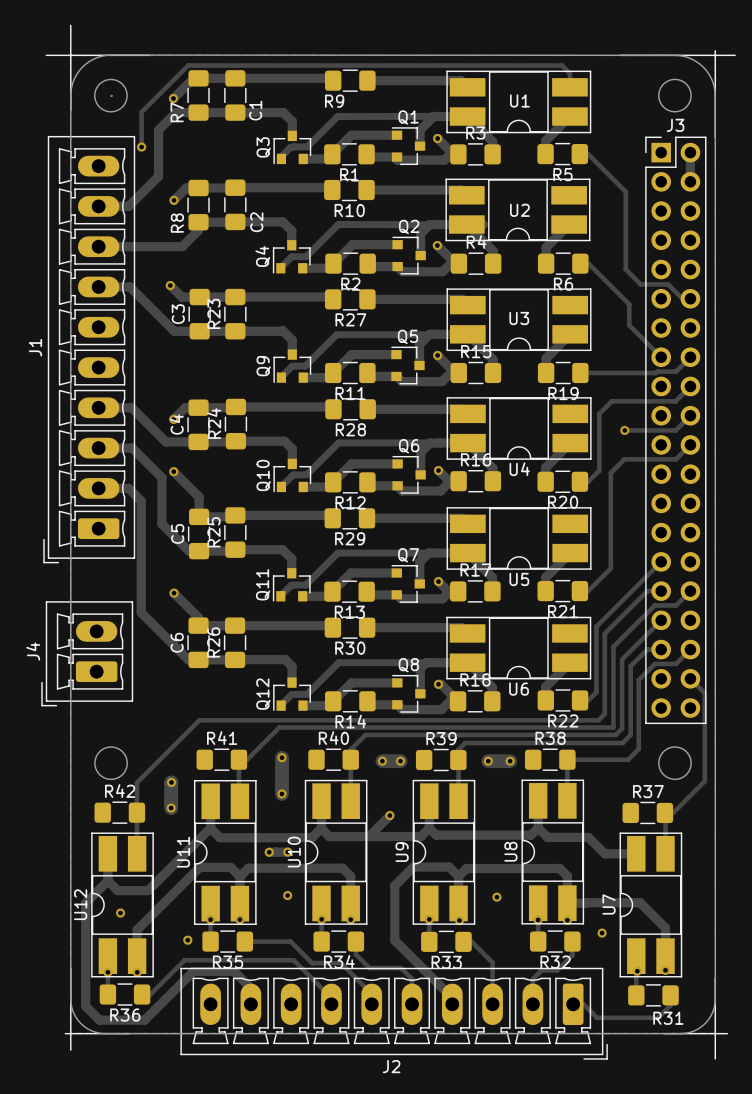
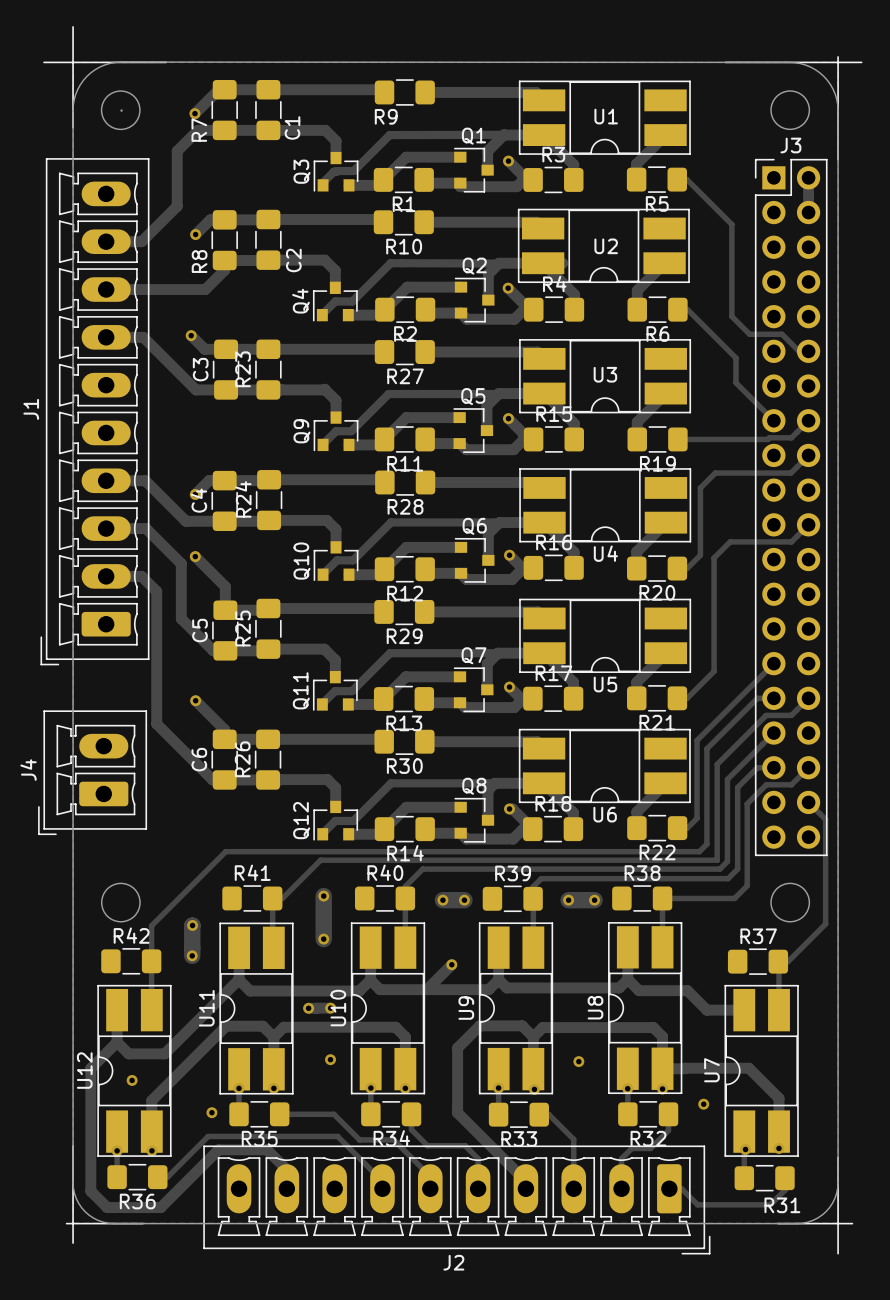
track: (569, 87) (569, 73) (562, 65) (188, 65) (141, 112) (141, 147) -> none
via: (141, 147) -> none
track: (690, 415) (675, 430) (624, 430) -> none
via: (624, 430) -> none

